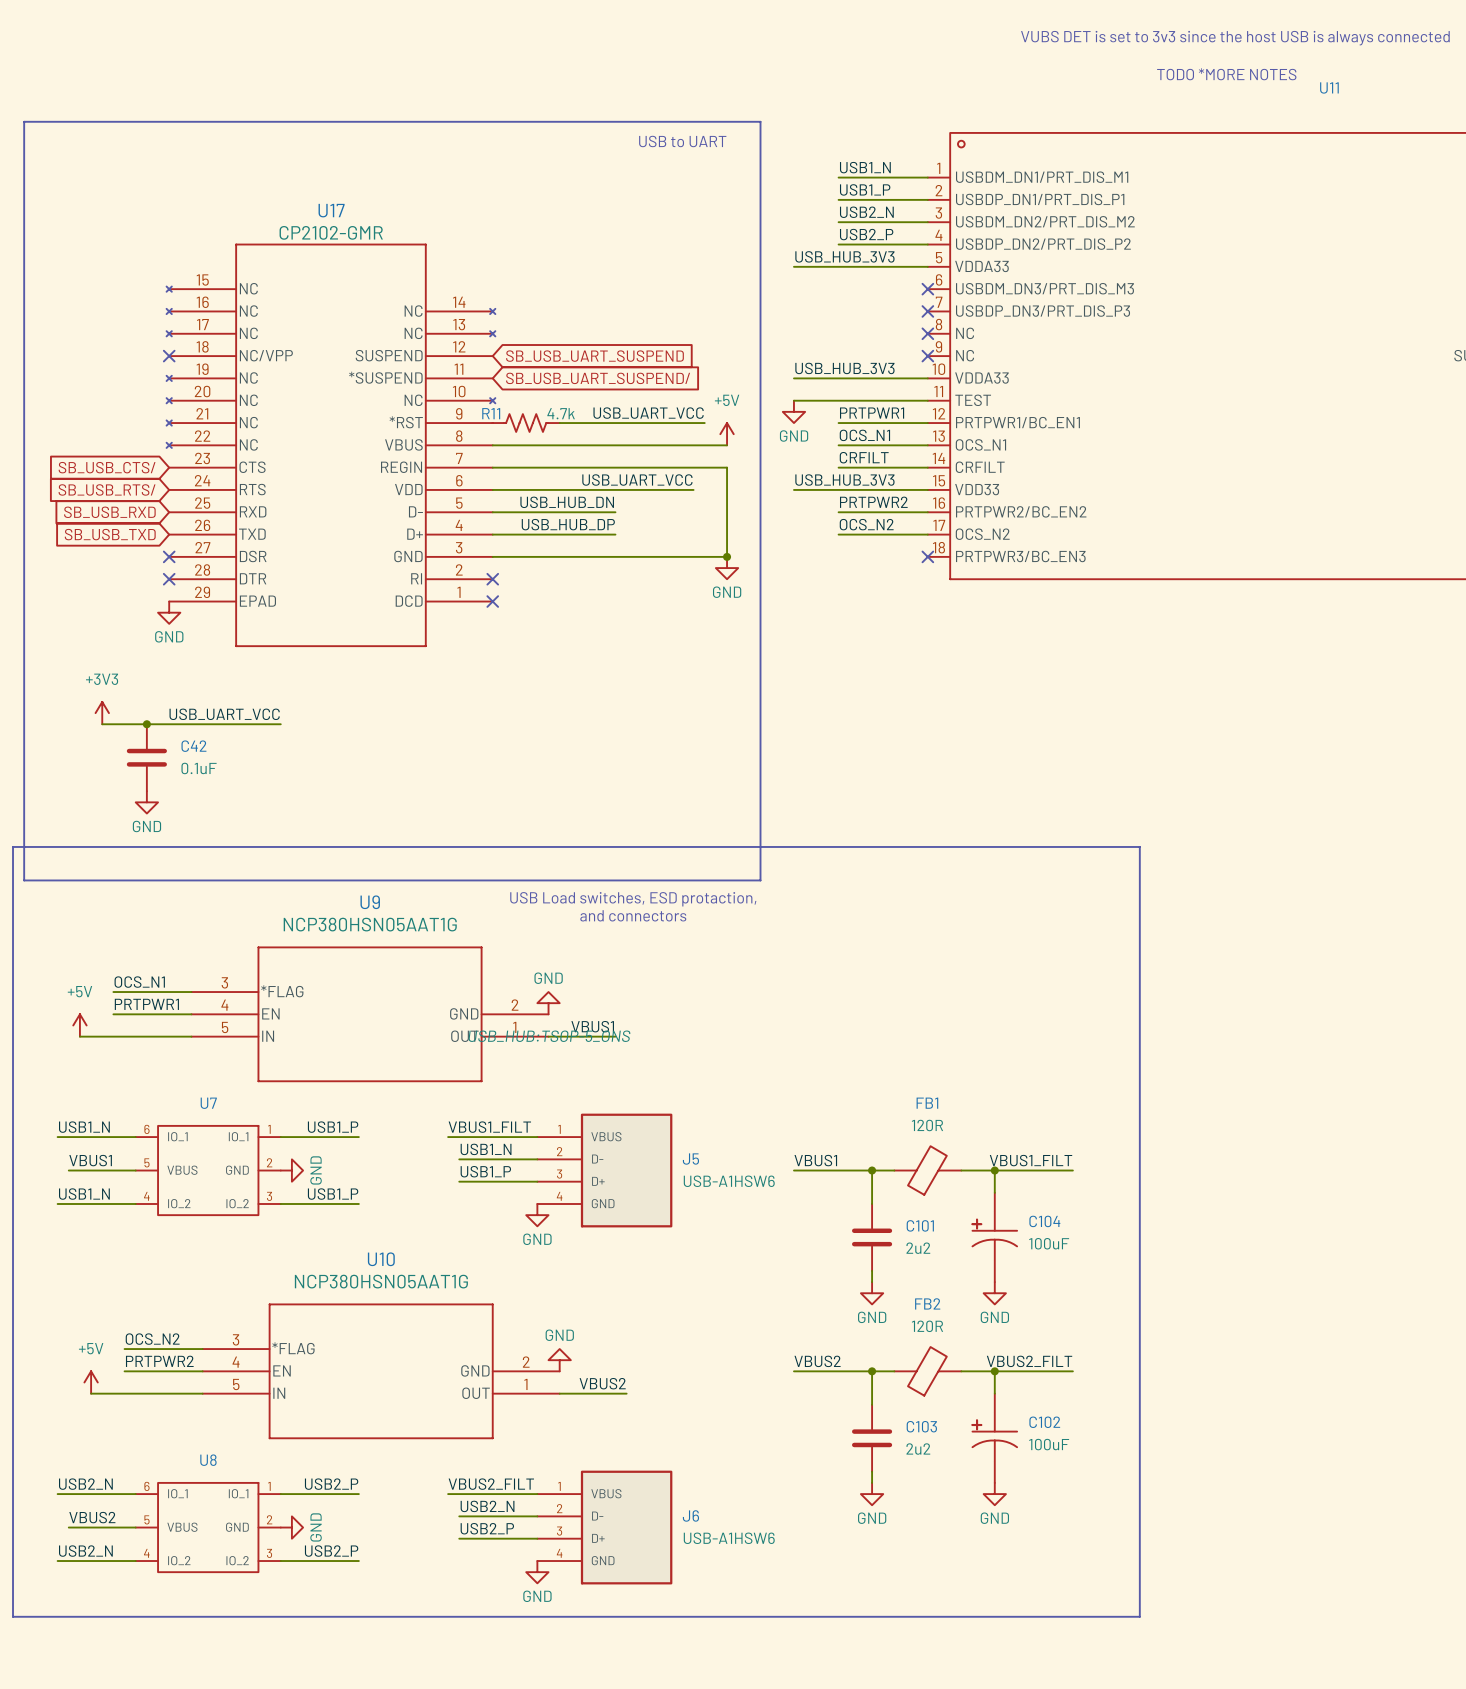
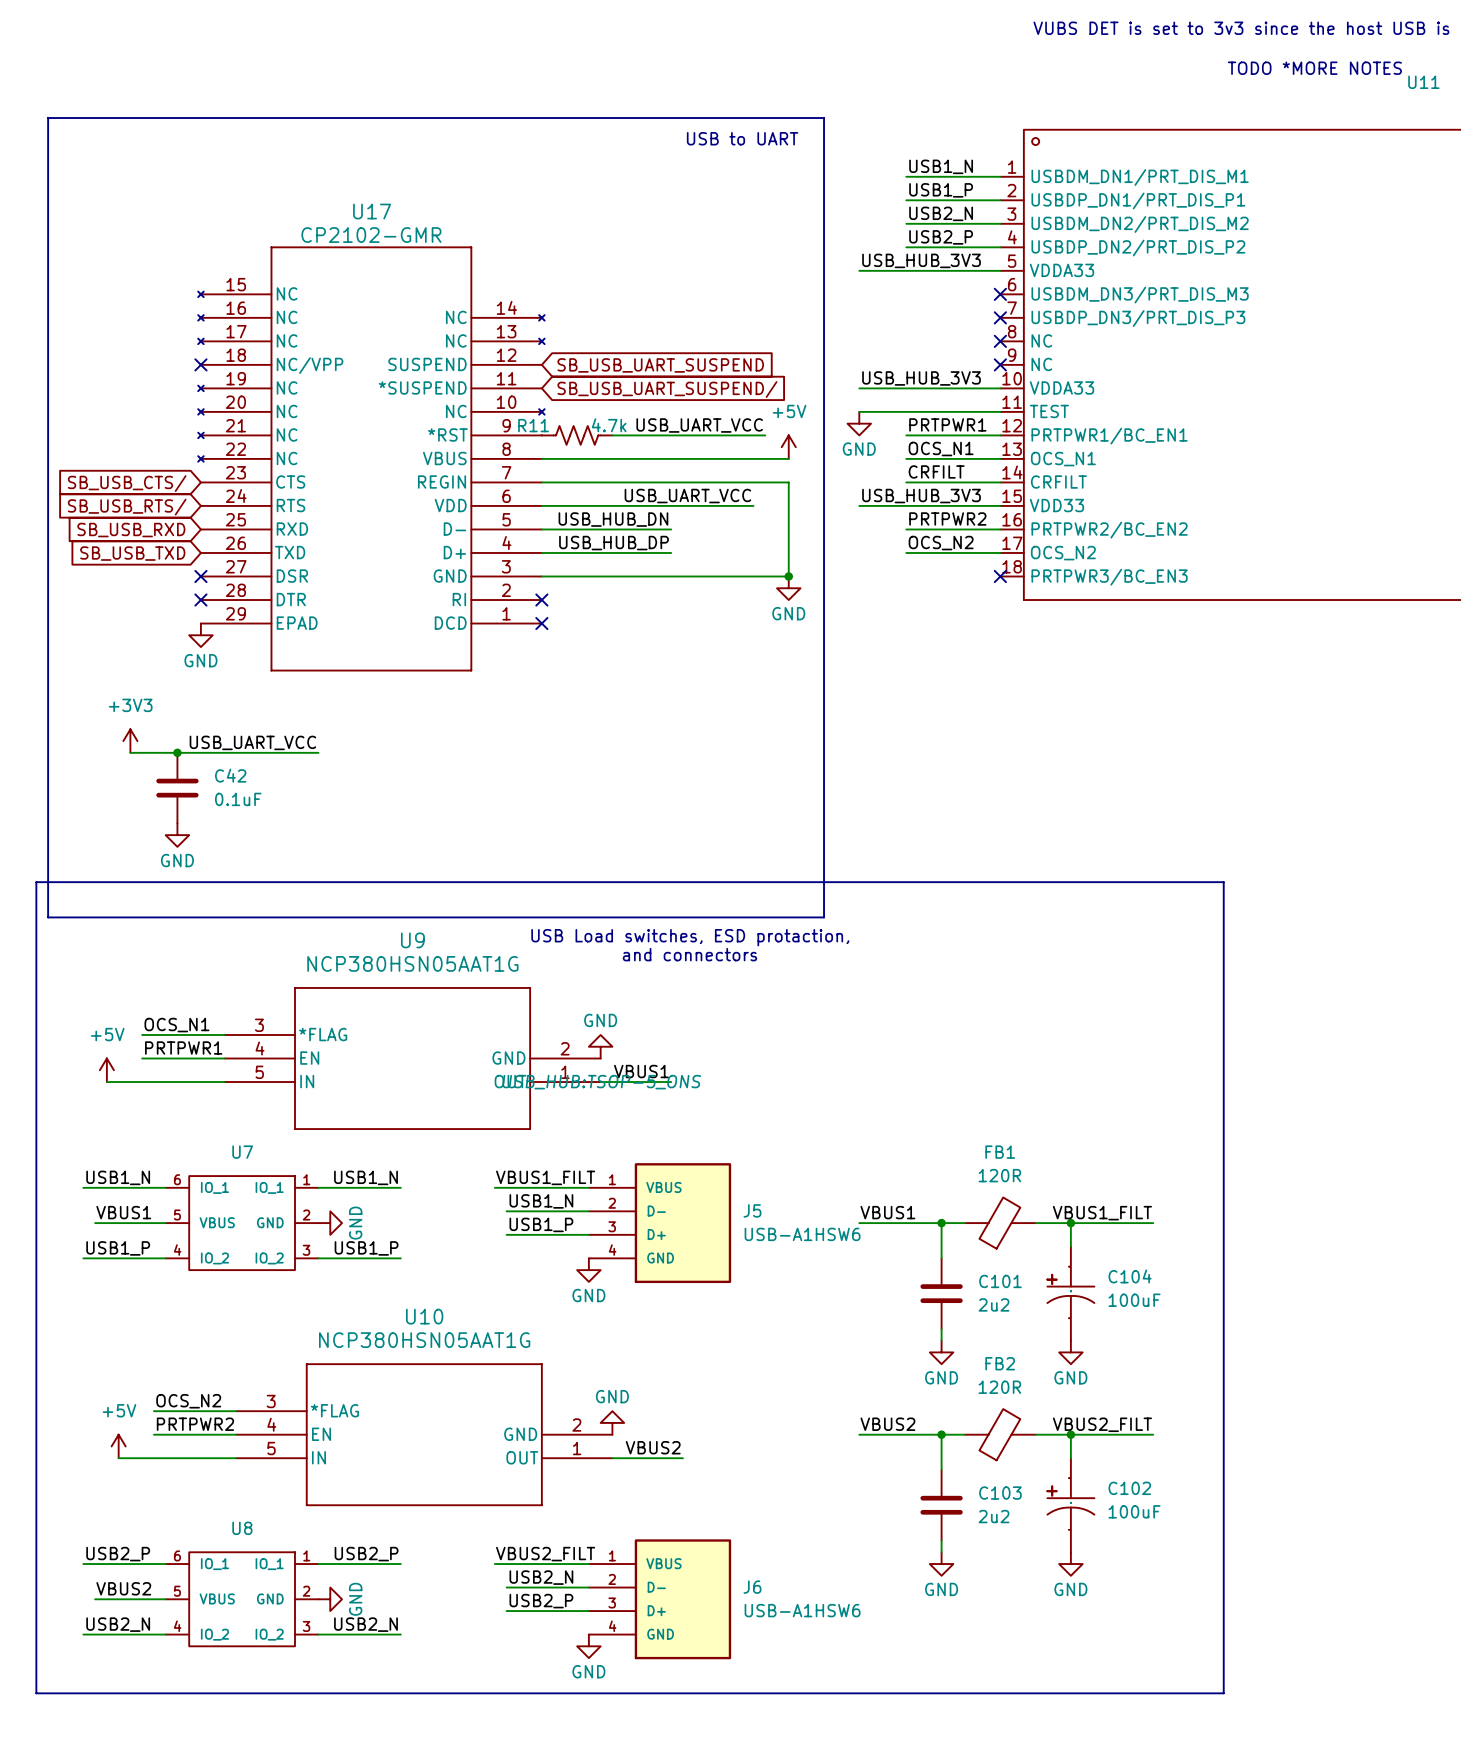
label: USB1_P (333, 1127) -> USB1_N (366, 1177)
label: USB1_N (84, 1194) -> USB1_P (118, 1248)
label: USB2_N (85, 1484) -> USB2_P (118, 1554)
label: USB2_P (331, 1551) -> USB2_N (366, 1624)

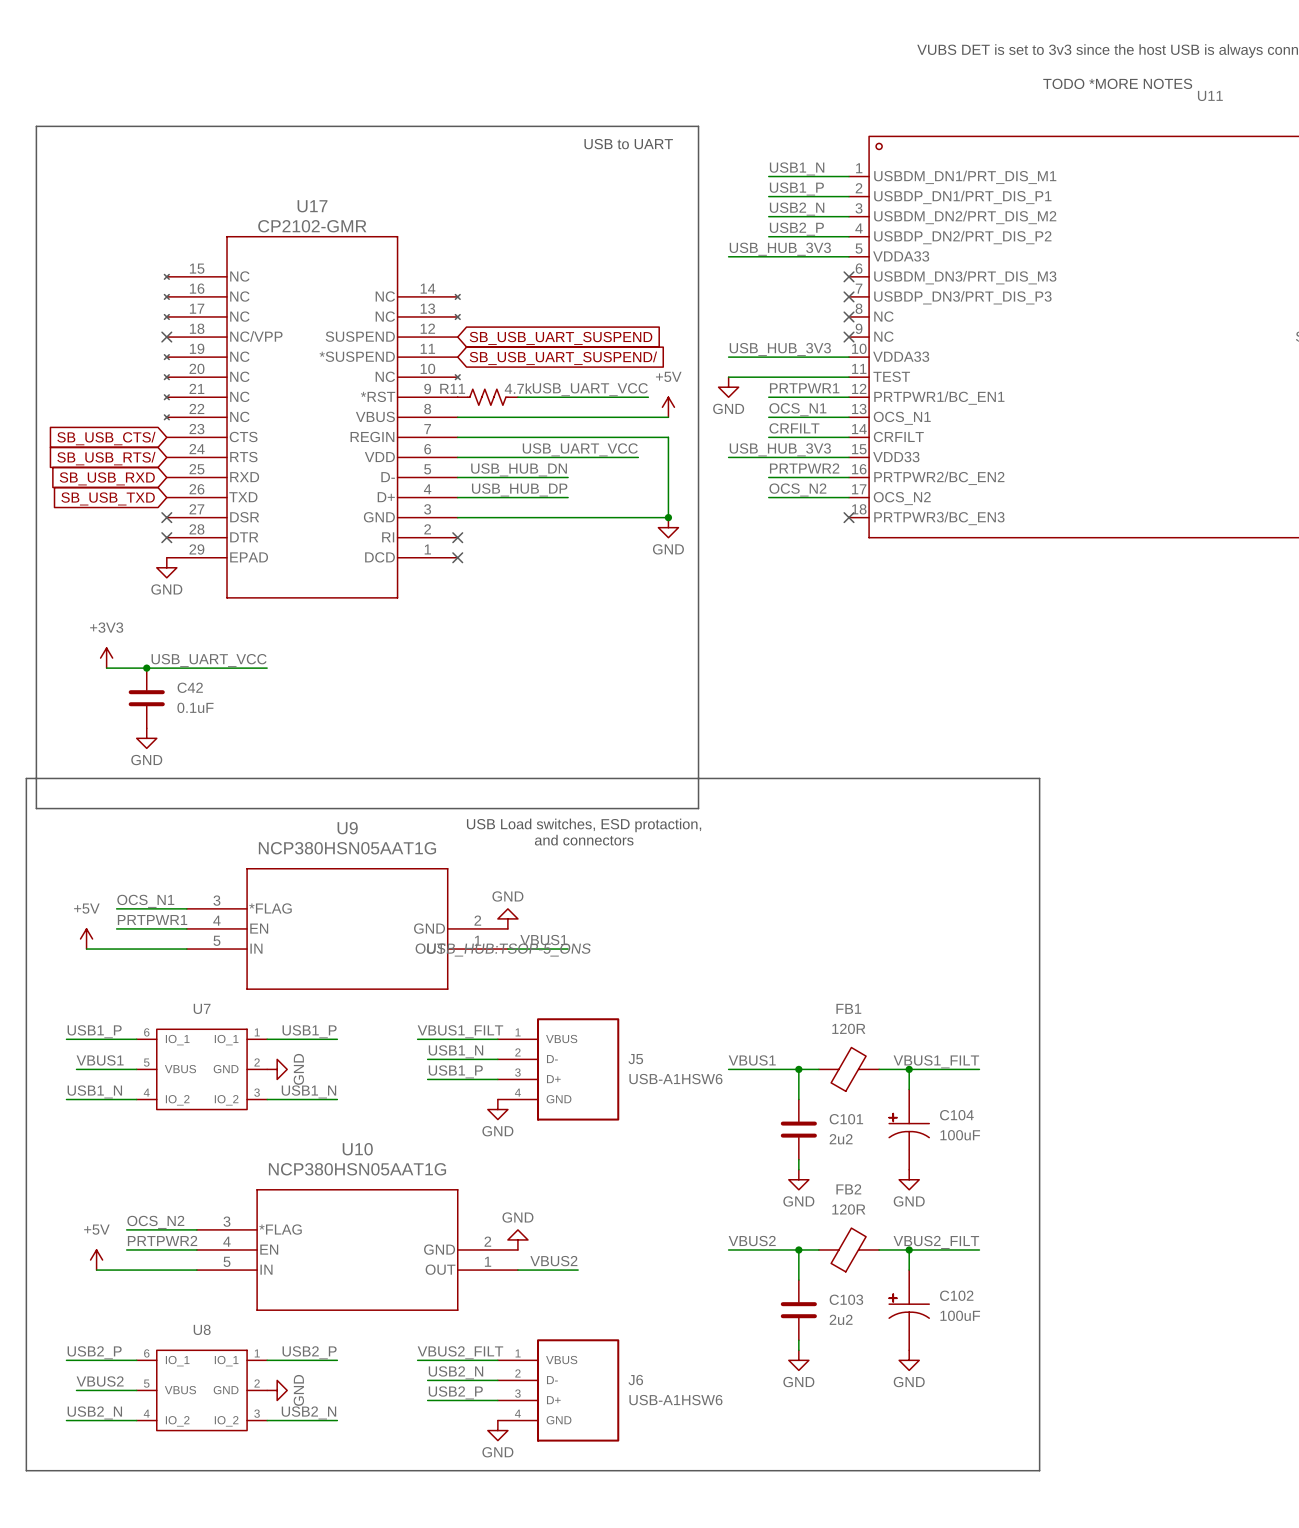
label: USB1_N (118, 1177) -> USB1_P (94, 1031)
label: USB1_N (366, 1177) -> USB1_P (309, 1031)
label: USB1_P (118, 1248) -> USB1_N (94, 1091)
label: USB1_P (366, 1248) -> USB1_N (308, 1091)

